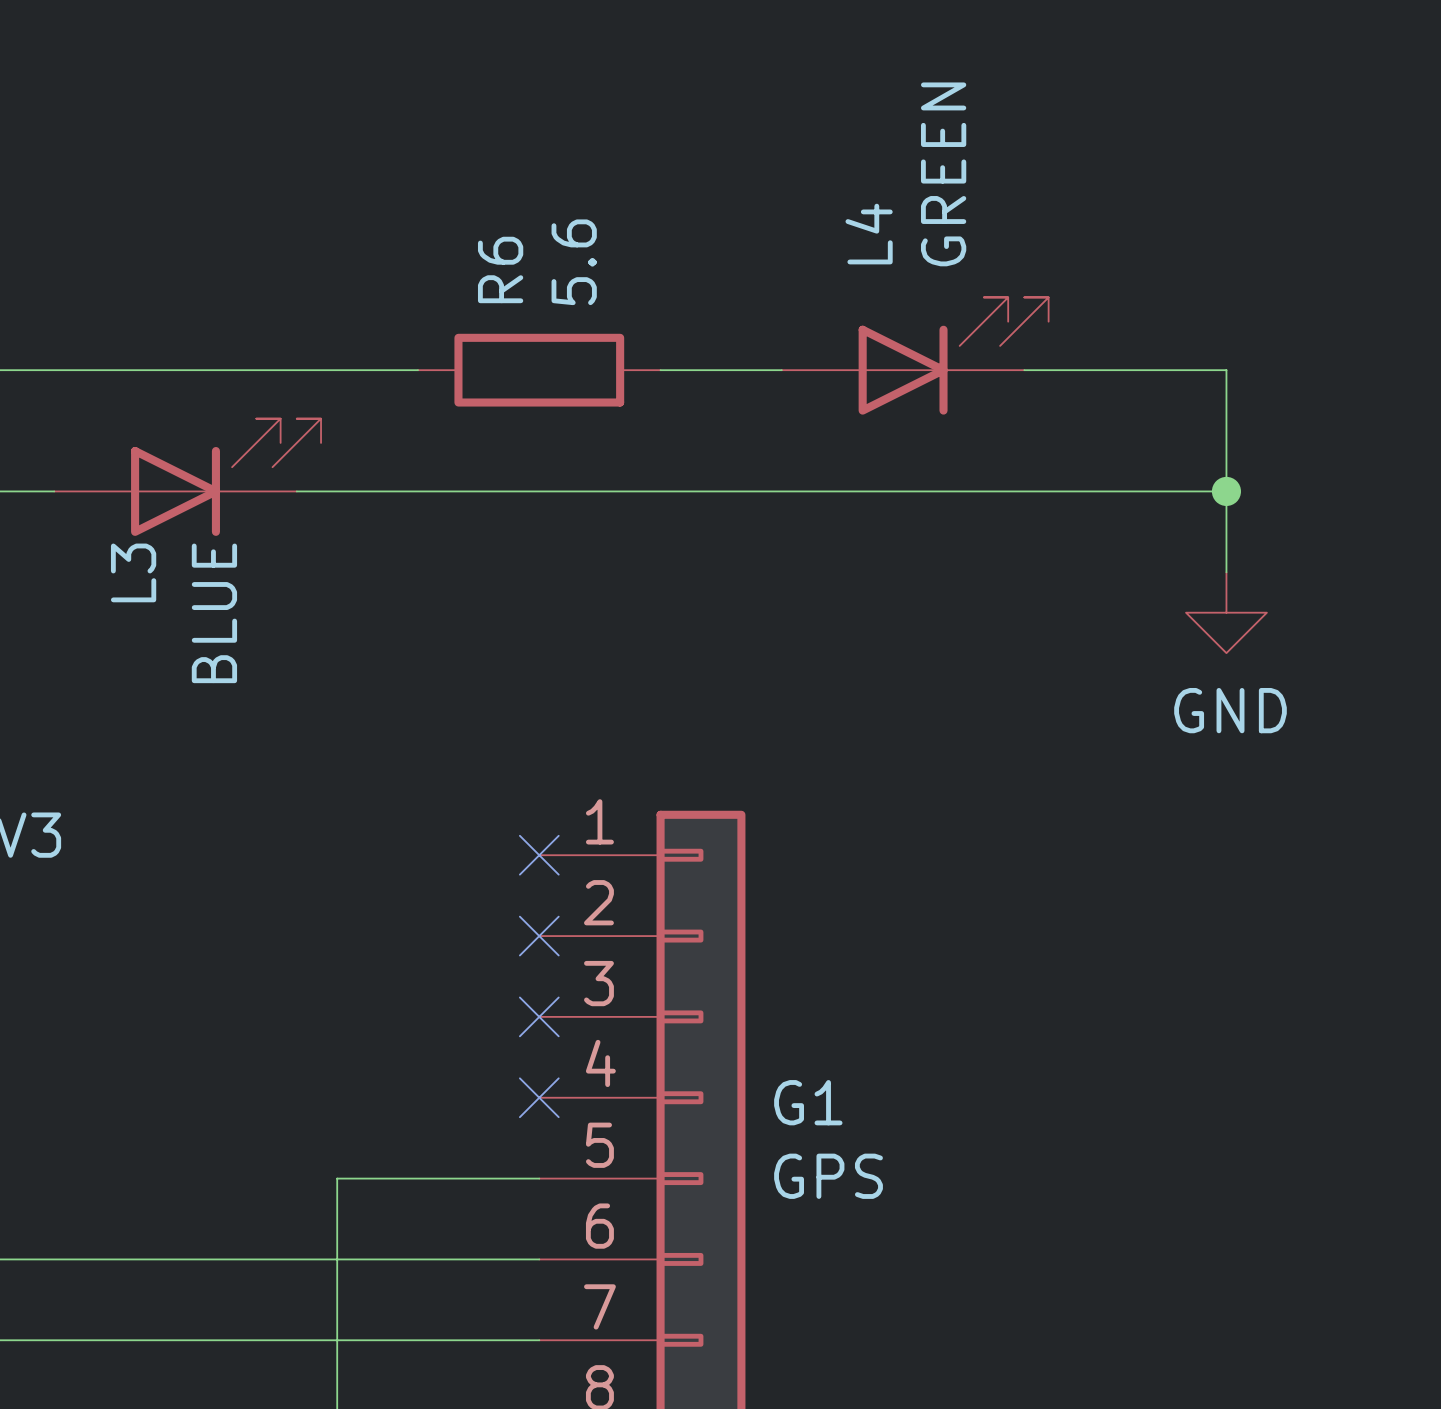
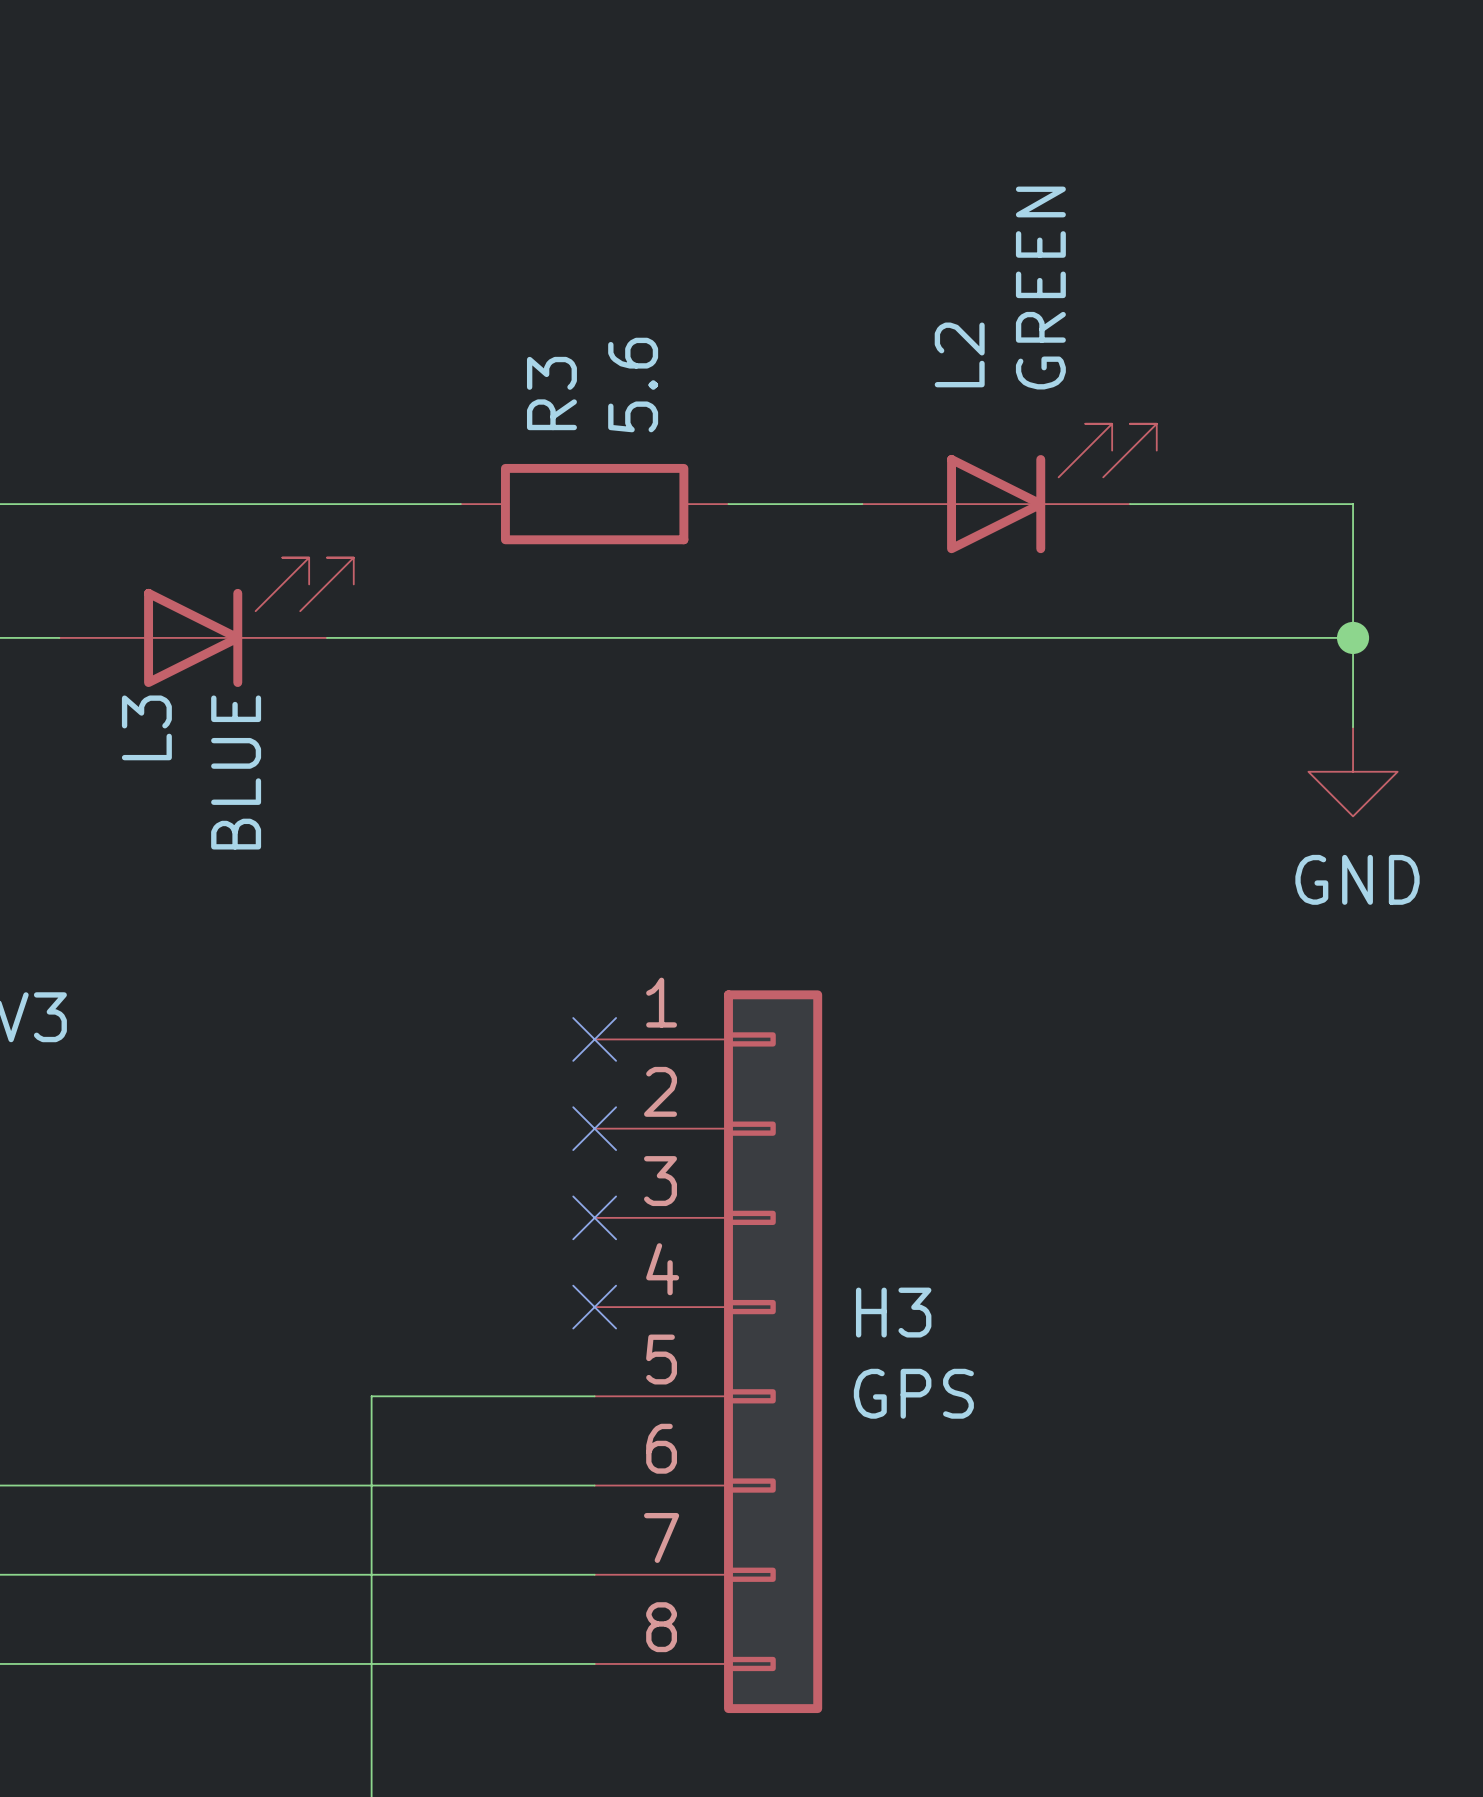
L4 name: L4 (869, 234) -> L2 (959, 354)
R6 name: R6 (500, 269) -> R3 (551, 393)
G1 name: G1 (808, 1102) -> H3 (893, 1312)

